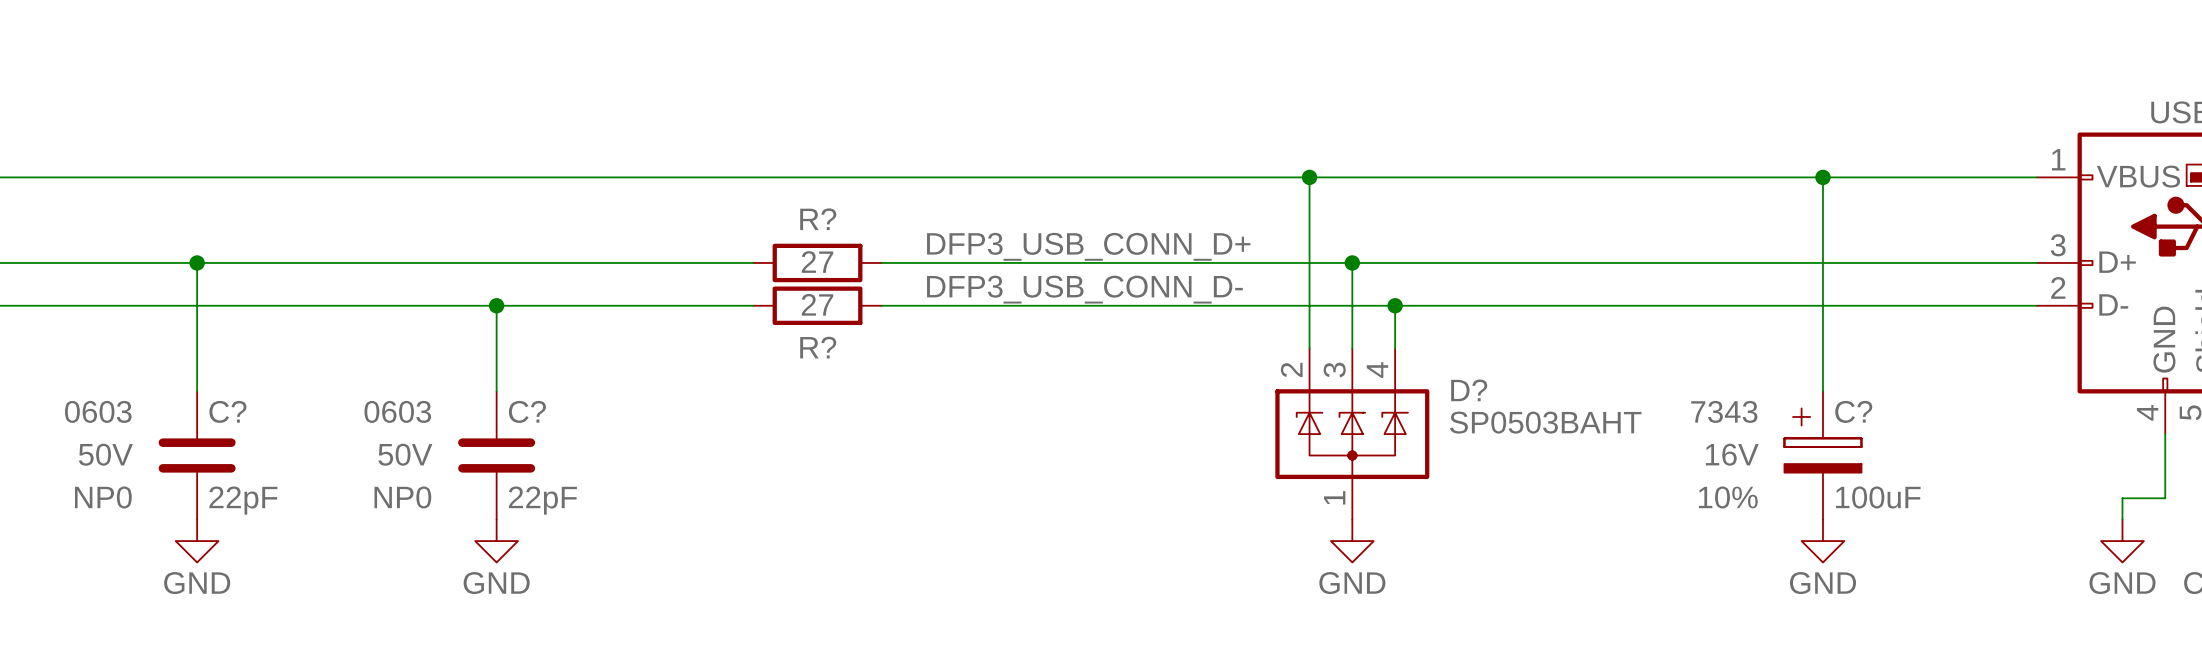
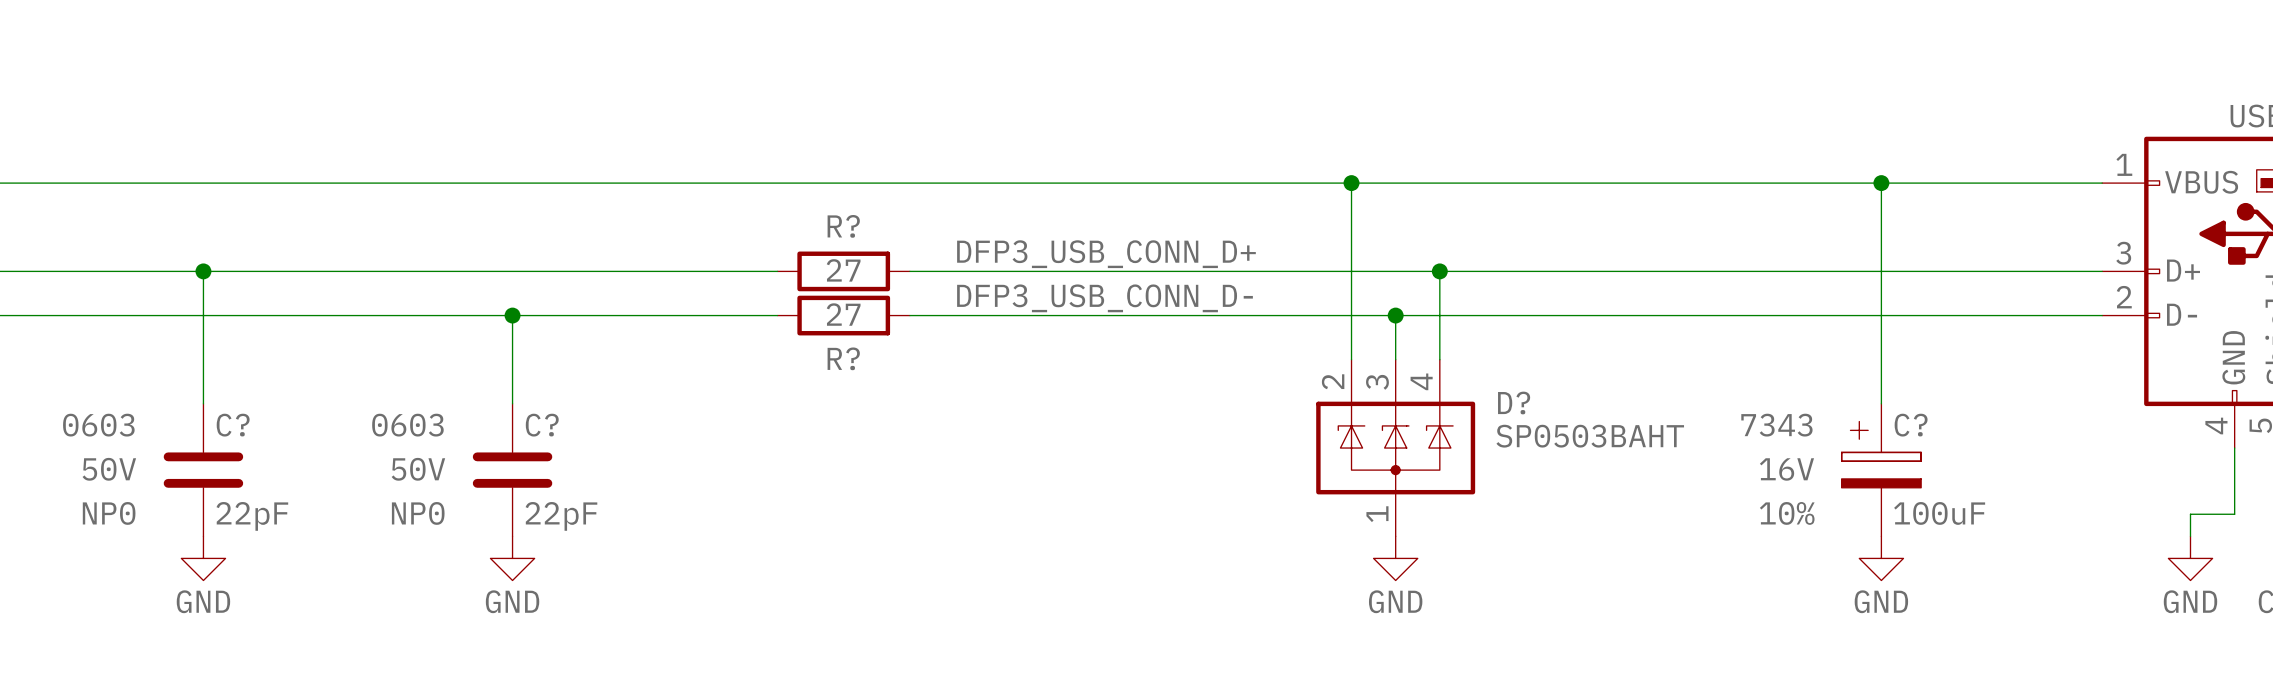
wire: (1352, 262) (1352, 305) -> (1439, 271) (1439, 315)
junction: (1352, 262) -> none
junction: none -> (1439, 271)
junction: none -> (1395, 315)
junction: (1395, 305) -> none

